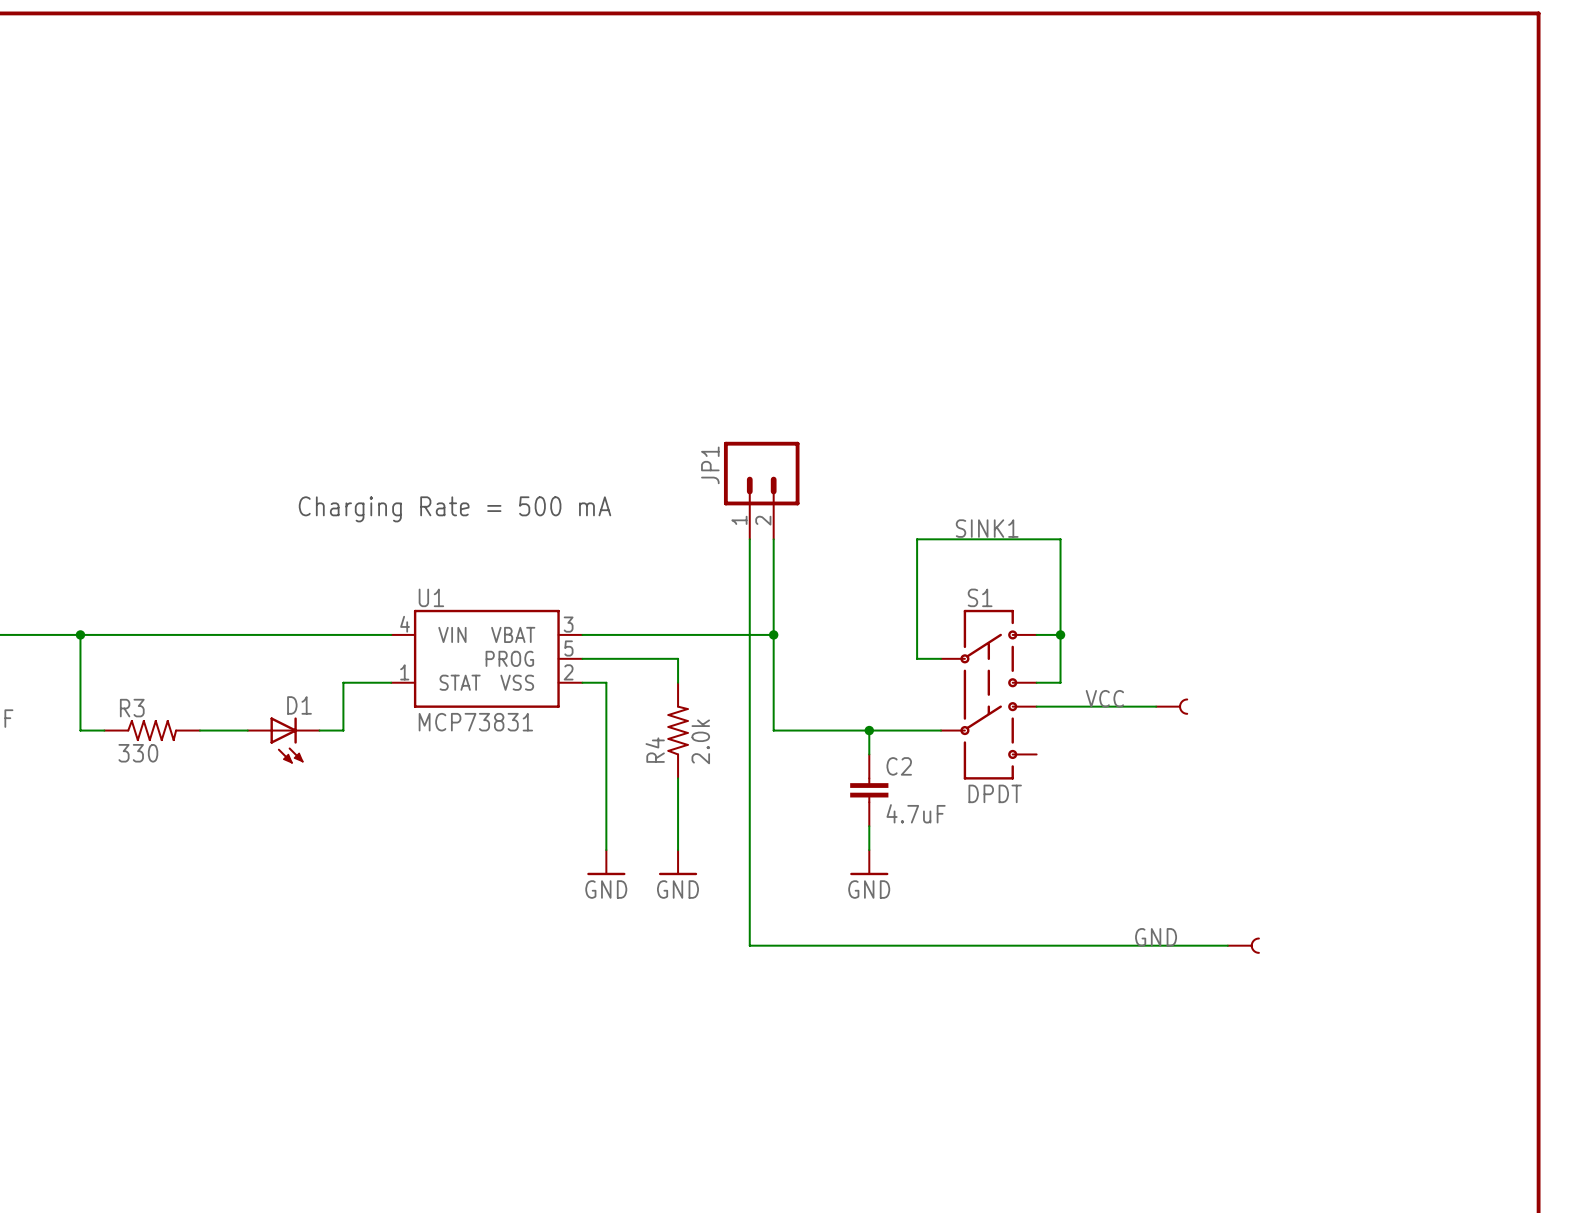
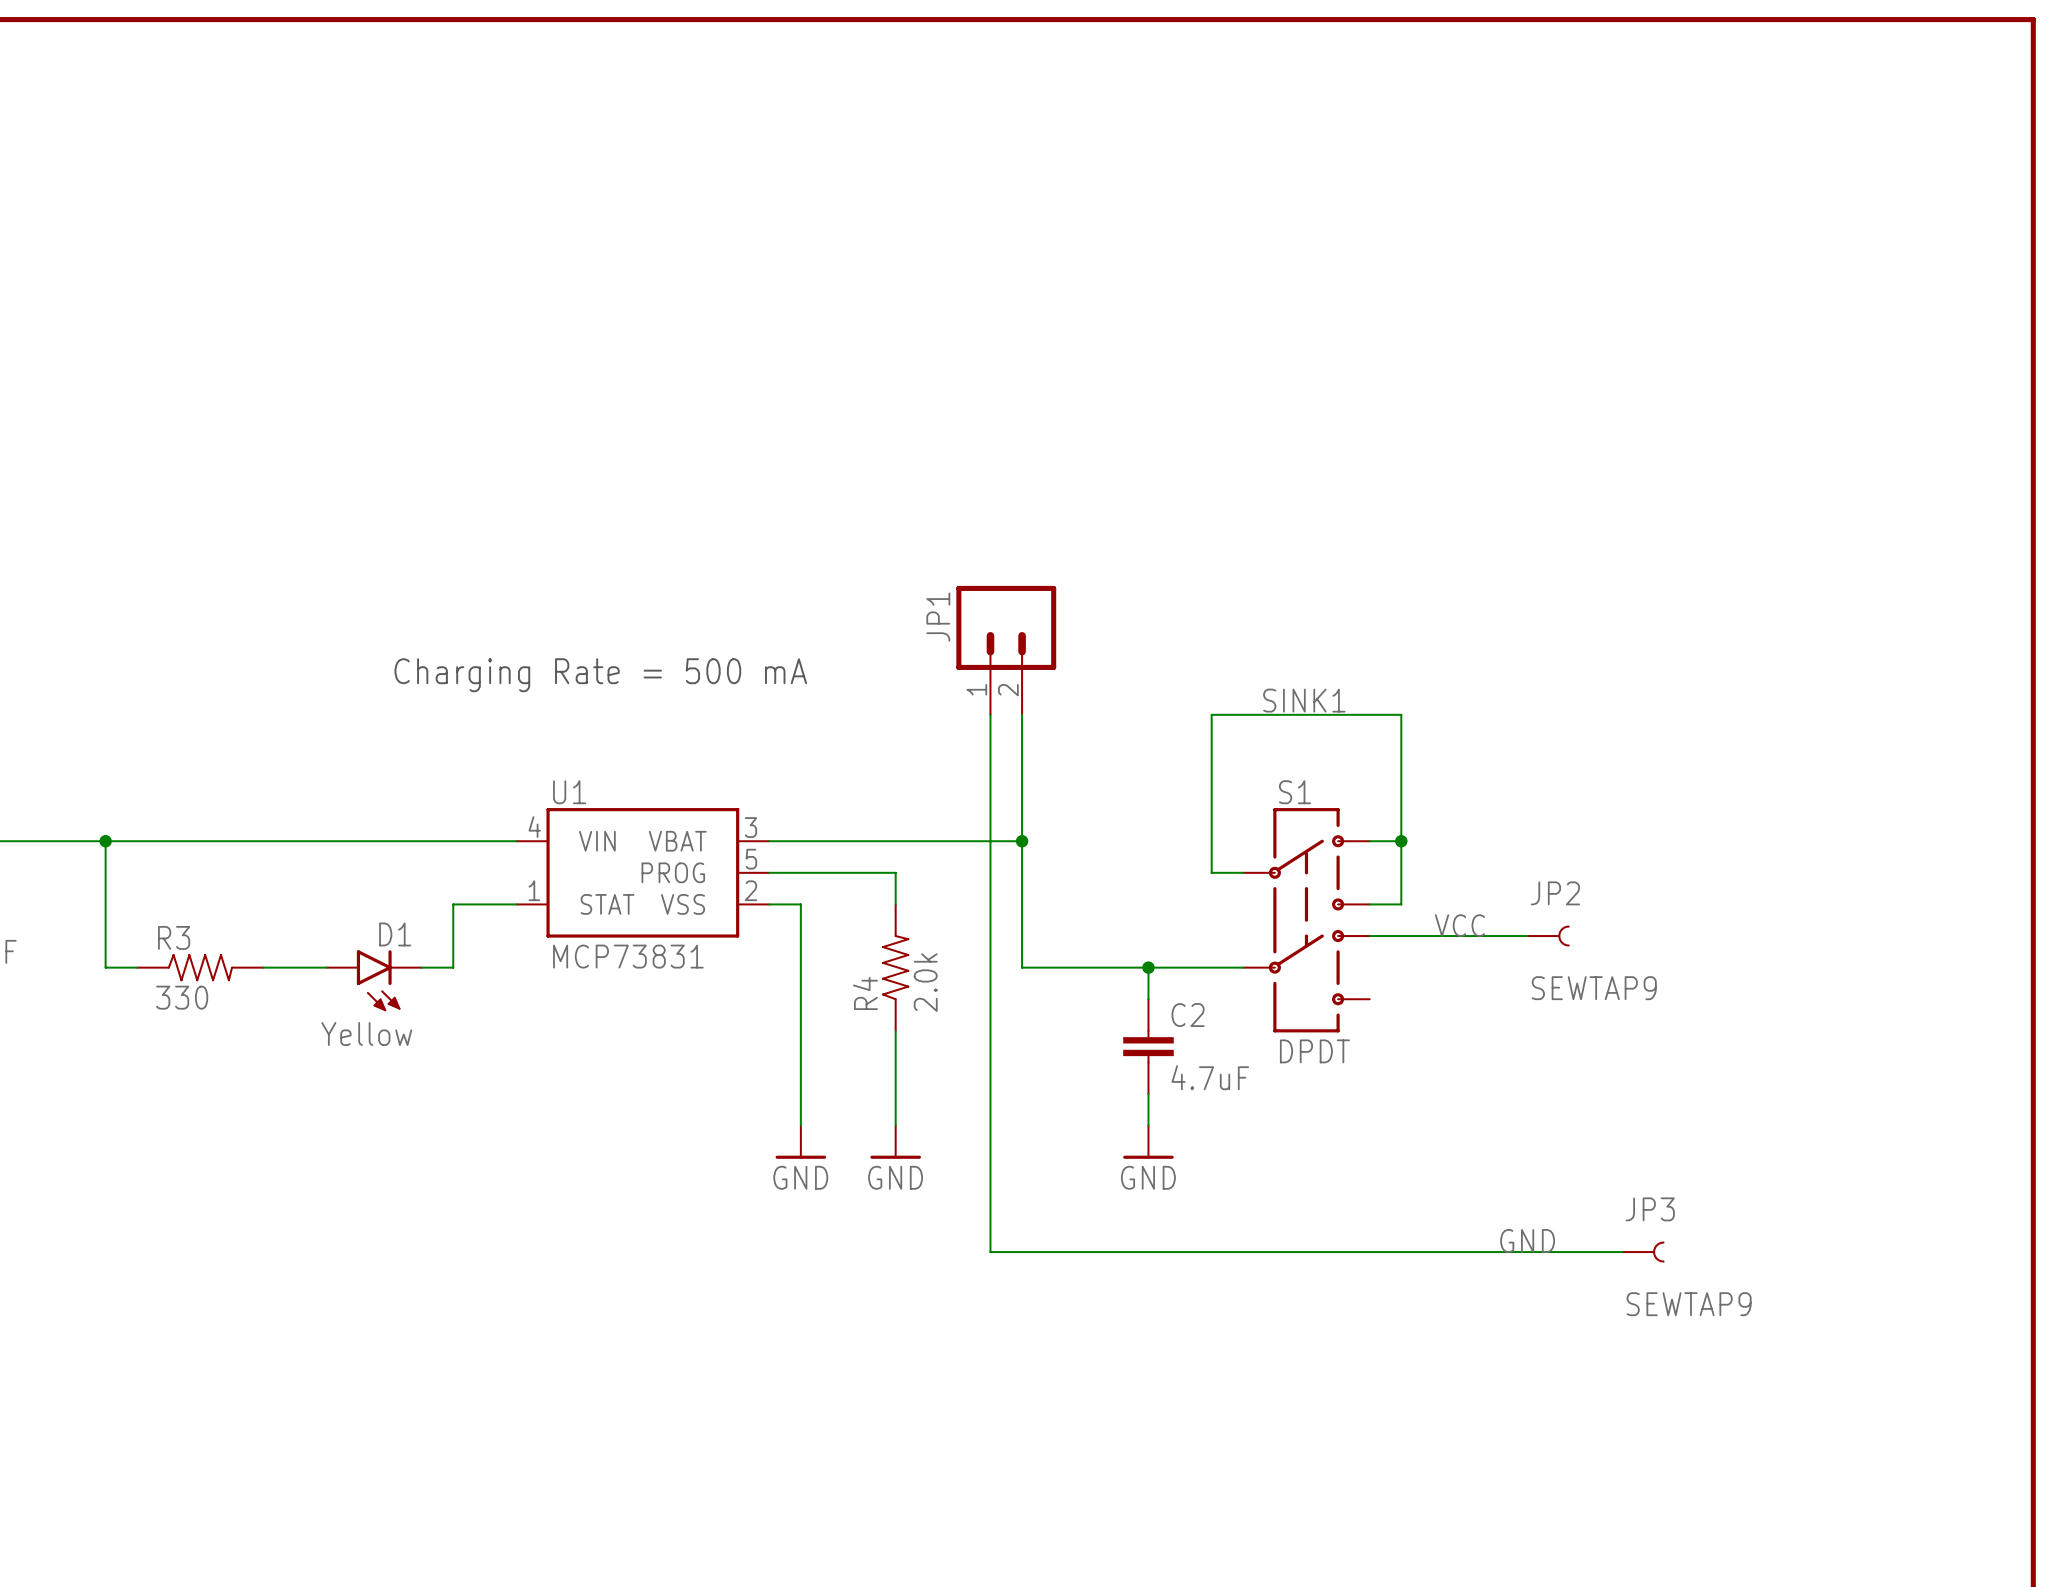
JP2 name: none -> JP2 (1555, 893)
D1 symbol: [247, 717, 320, 764] -> [326, 950, 422, 1012]
JP2 value: none -> SEWTAP9 (1594, 988)
D1 value: none -> Yellow (366, 1034)
JP3 name: none -> JP3 (1650, 1209)
JP3 value: none -> SEWTAP9 (1689, 1304)

